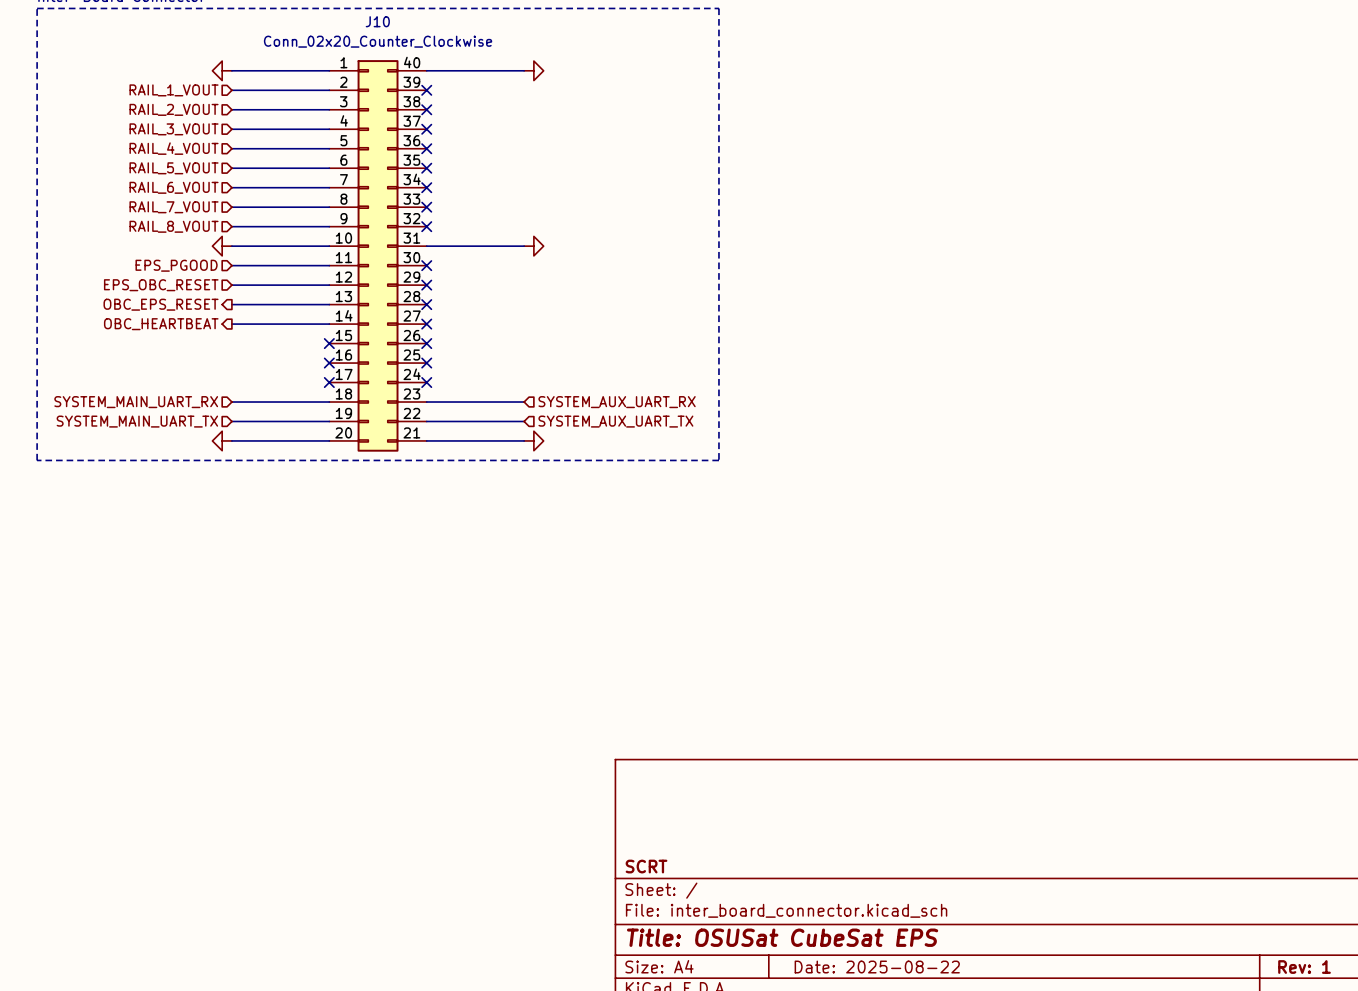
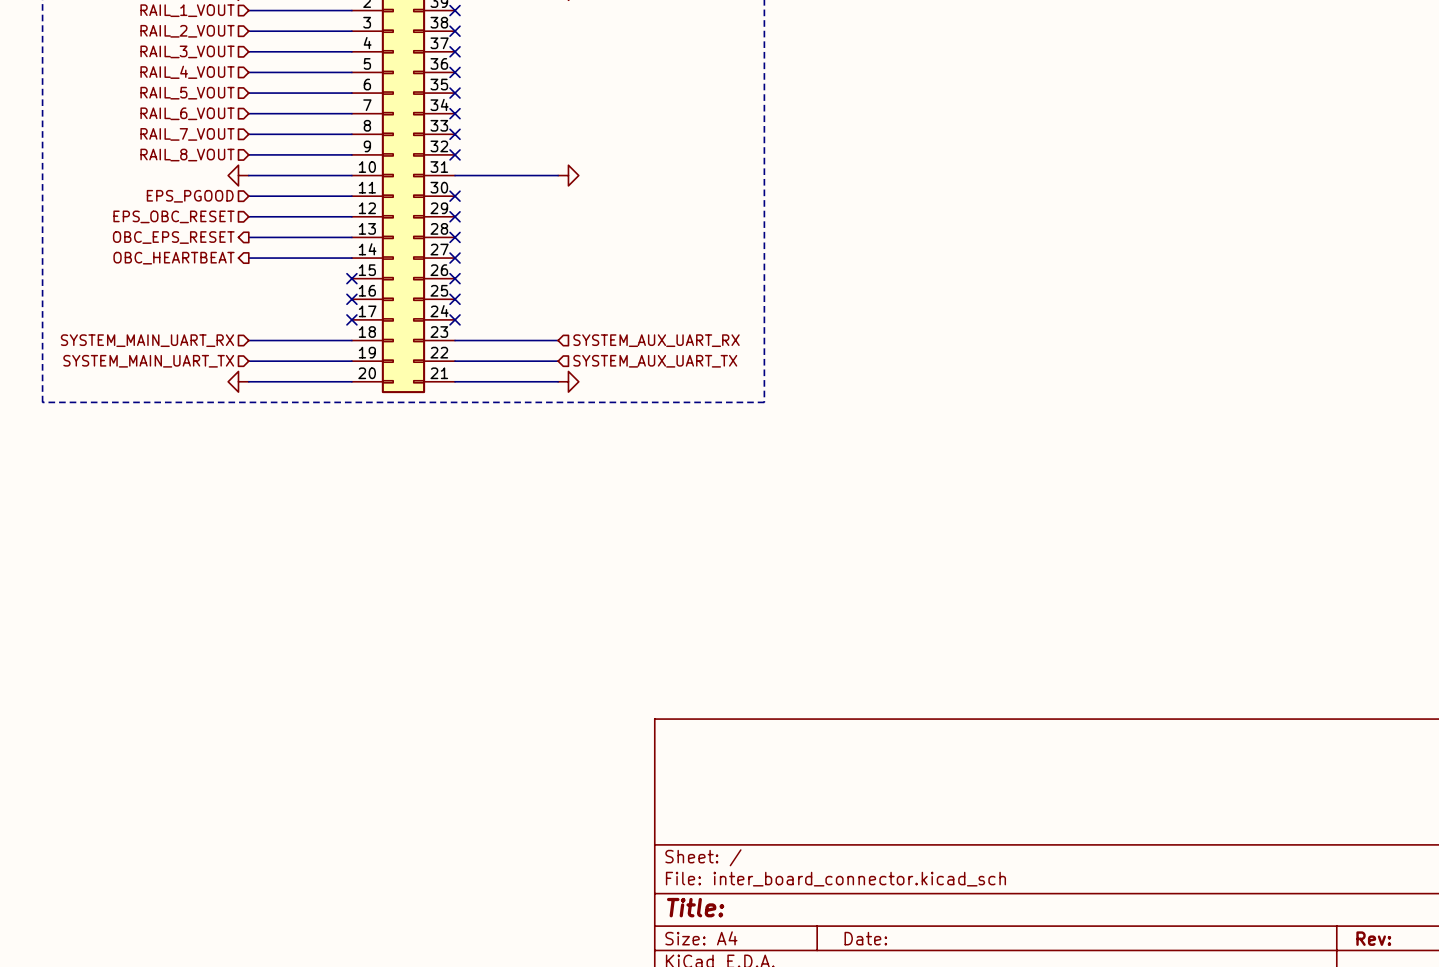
title block: SCRT (646, 866) -> none
title block: Title: OSUSat CubeSat EPS (782, 937) -> Title: (695, 907)
title block: Date: 2025-08-22 (877, 967) -> Date: (865, 938)
title block: Rev: 1 (1304, 967) -> Rev: (1373, 938)

